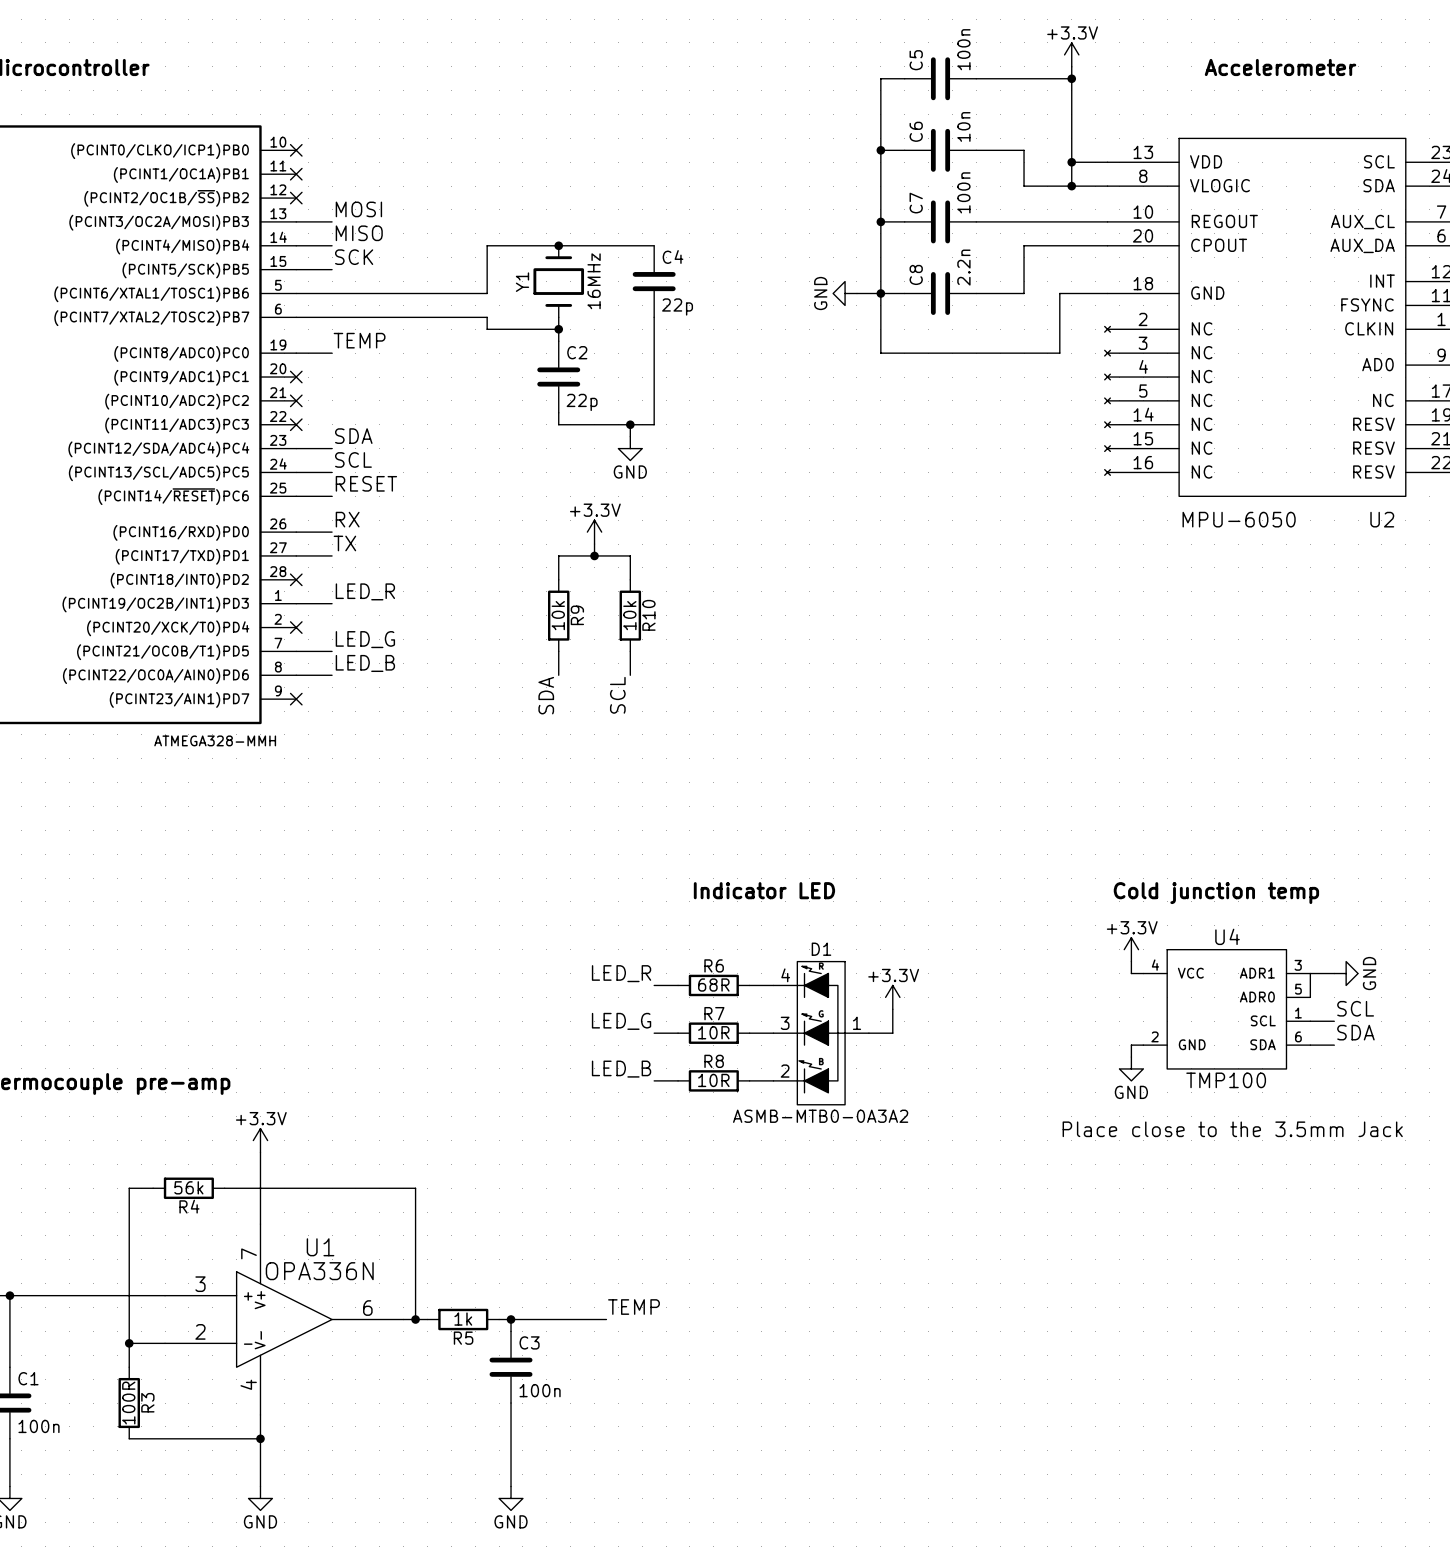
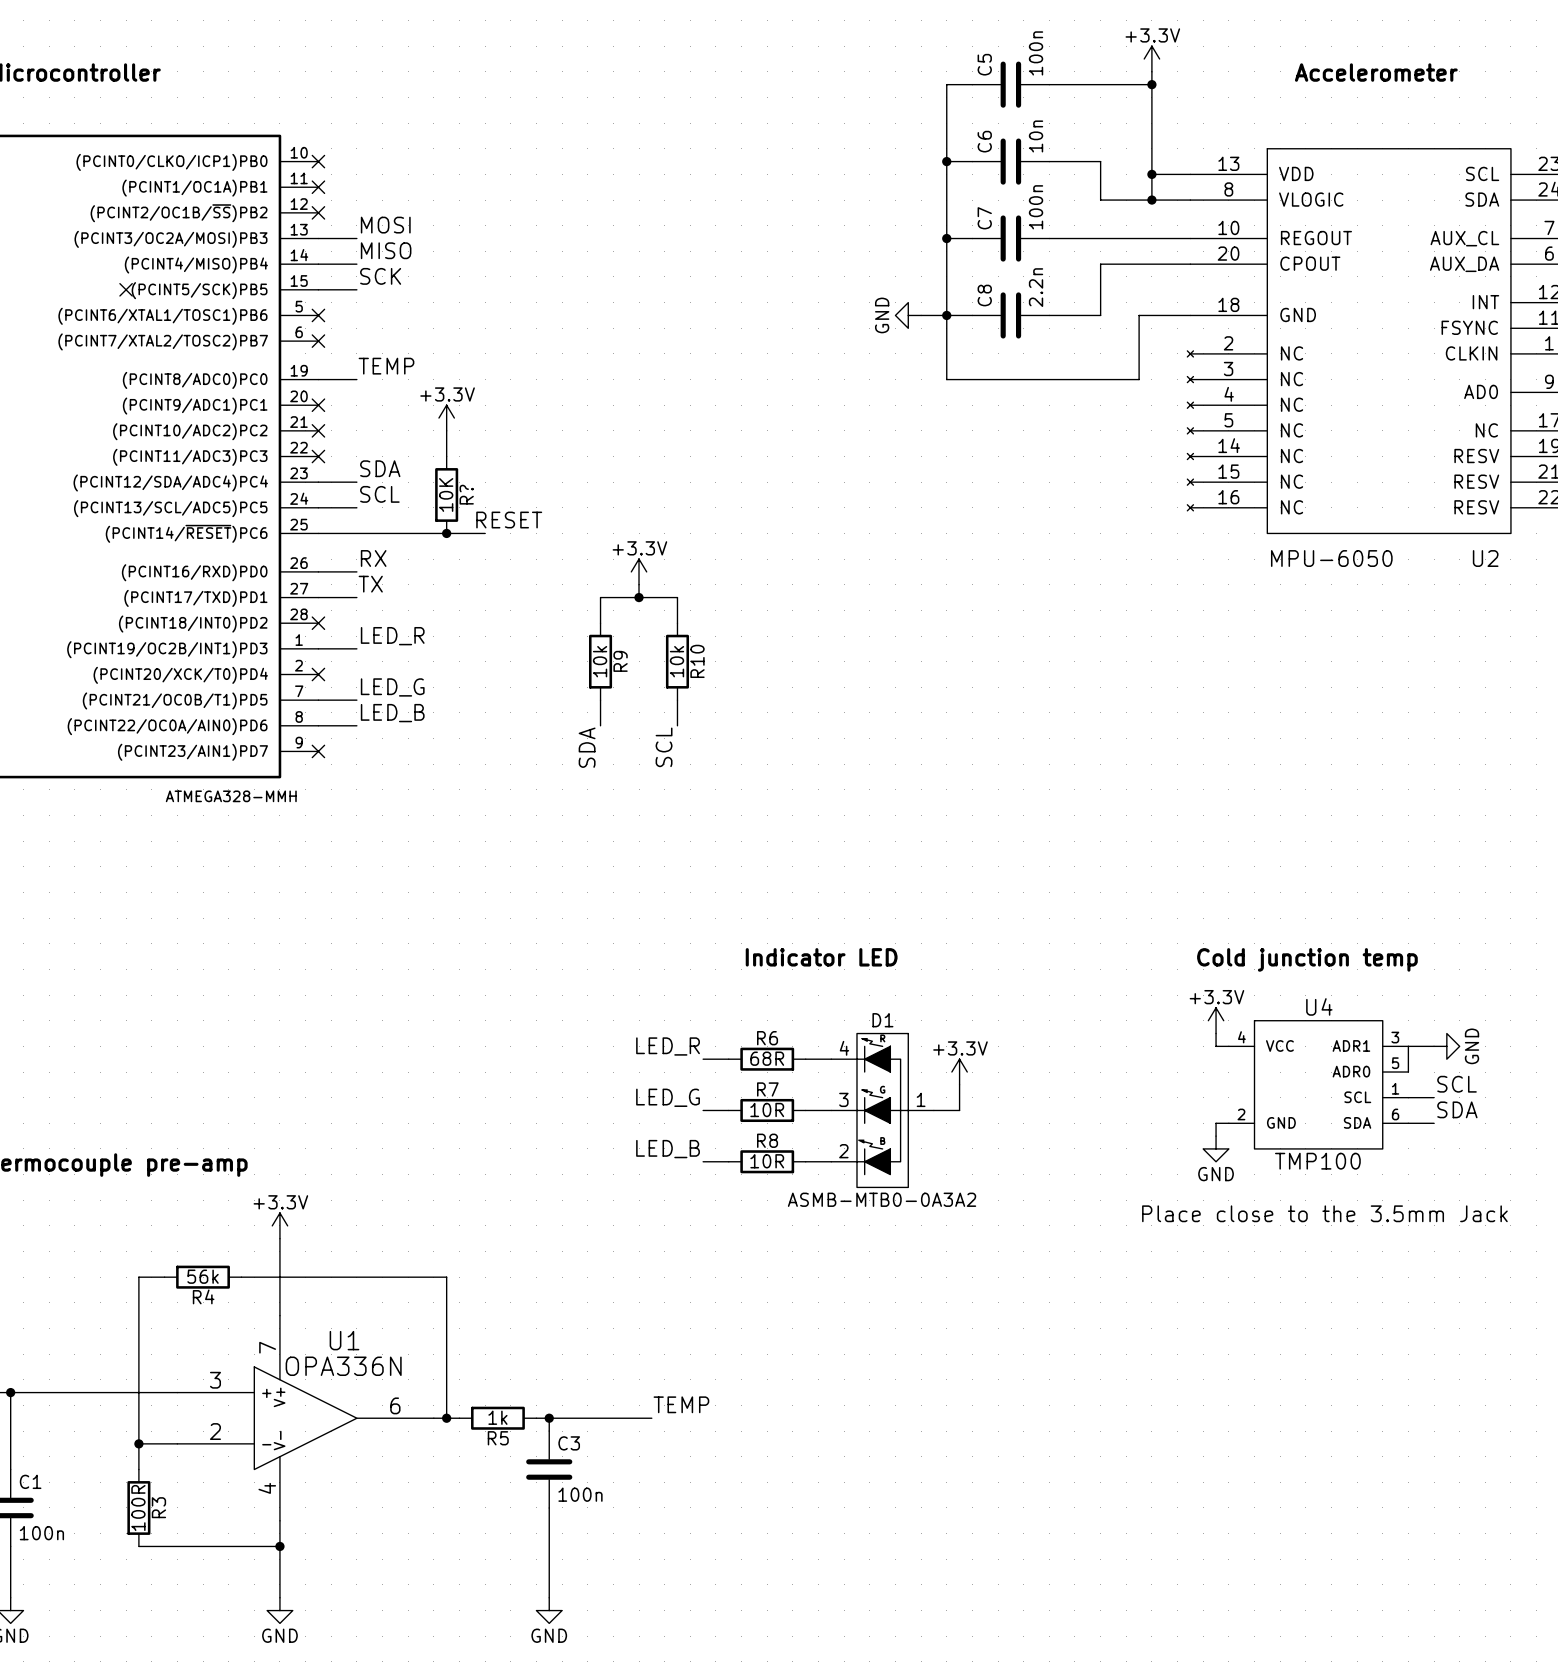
junction: (558, 245) -> none
wire: (654, 245) (487, 245) (487, 293) (296, 293) -> none
no-connect mark: none -> (126, 289)
Y1: 16MHz (558, 281) -> none
C4: 22p (654, 281) -> none
no-connect mark: none -> (318, 315)
wire: (296, 317) (487, 317) (487, 329) (558, 329) -> none
no-connect mark: none -> (318, 341)
wire: (558, 317) (558, 341) -> (446, 430) (446, 456)
wire: (654, 317) (654, 424) (558, 424) (558, 412) -> none
junction: (558, 329) -> none
C2: 22p (558, 377) -> none
power symbol: none -> +3.3V (446, 418)
wire: (630, 424) (630, 436) -> none
junction: (630, 424) -> none
power symbol: GND (630, 448) -> none
R?: none -> 10K (446, 494)
label position: RESET (366, 483) -> RESET (509, 520)
wire: none -> (356, 533) (485, 533)
junction: none -> (446, 533)

